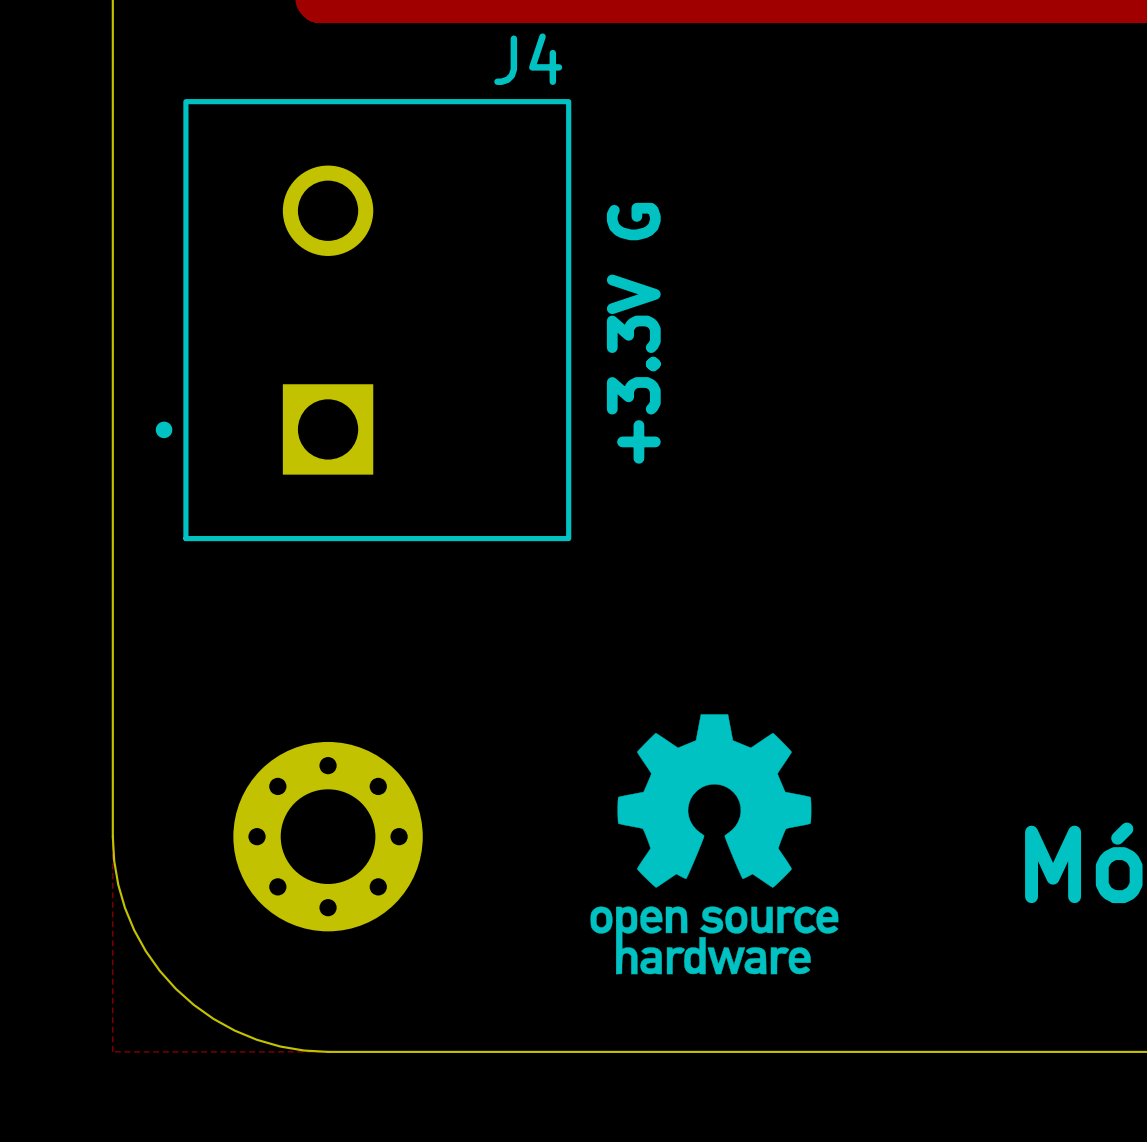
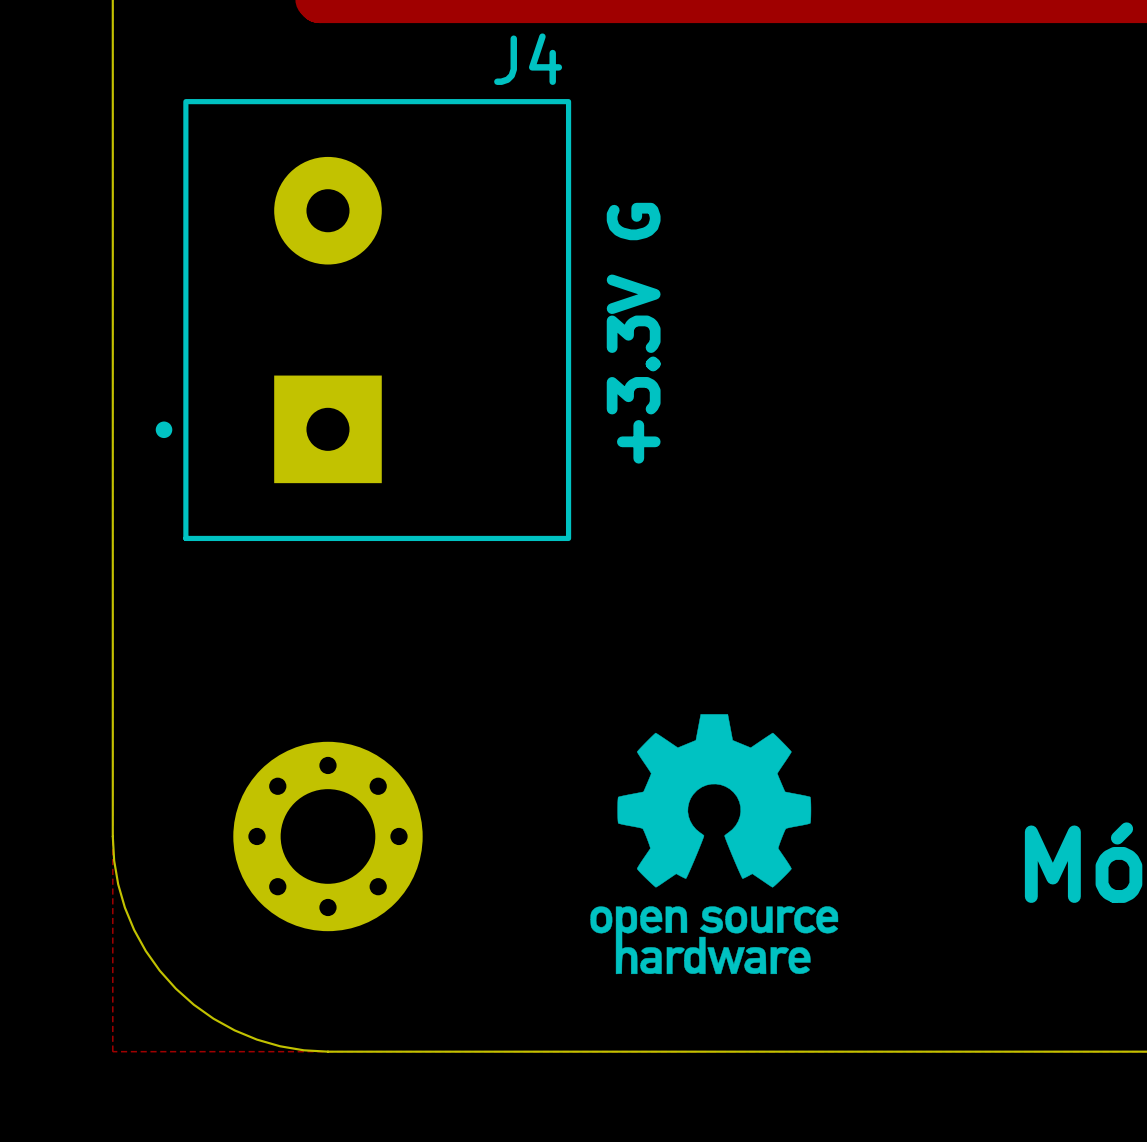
J4 footprint: [155, 99, 572, 542] -> [155, 99, 572, 542]

